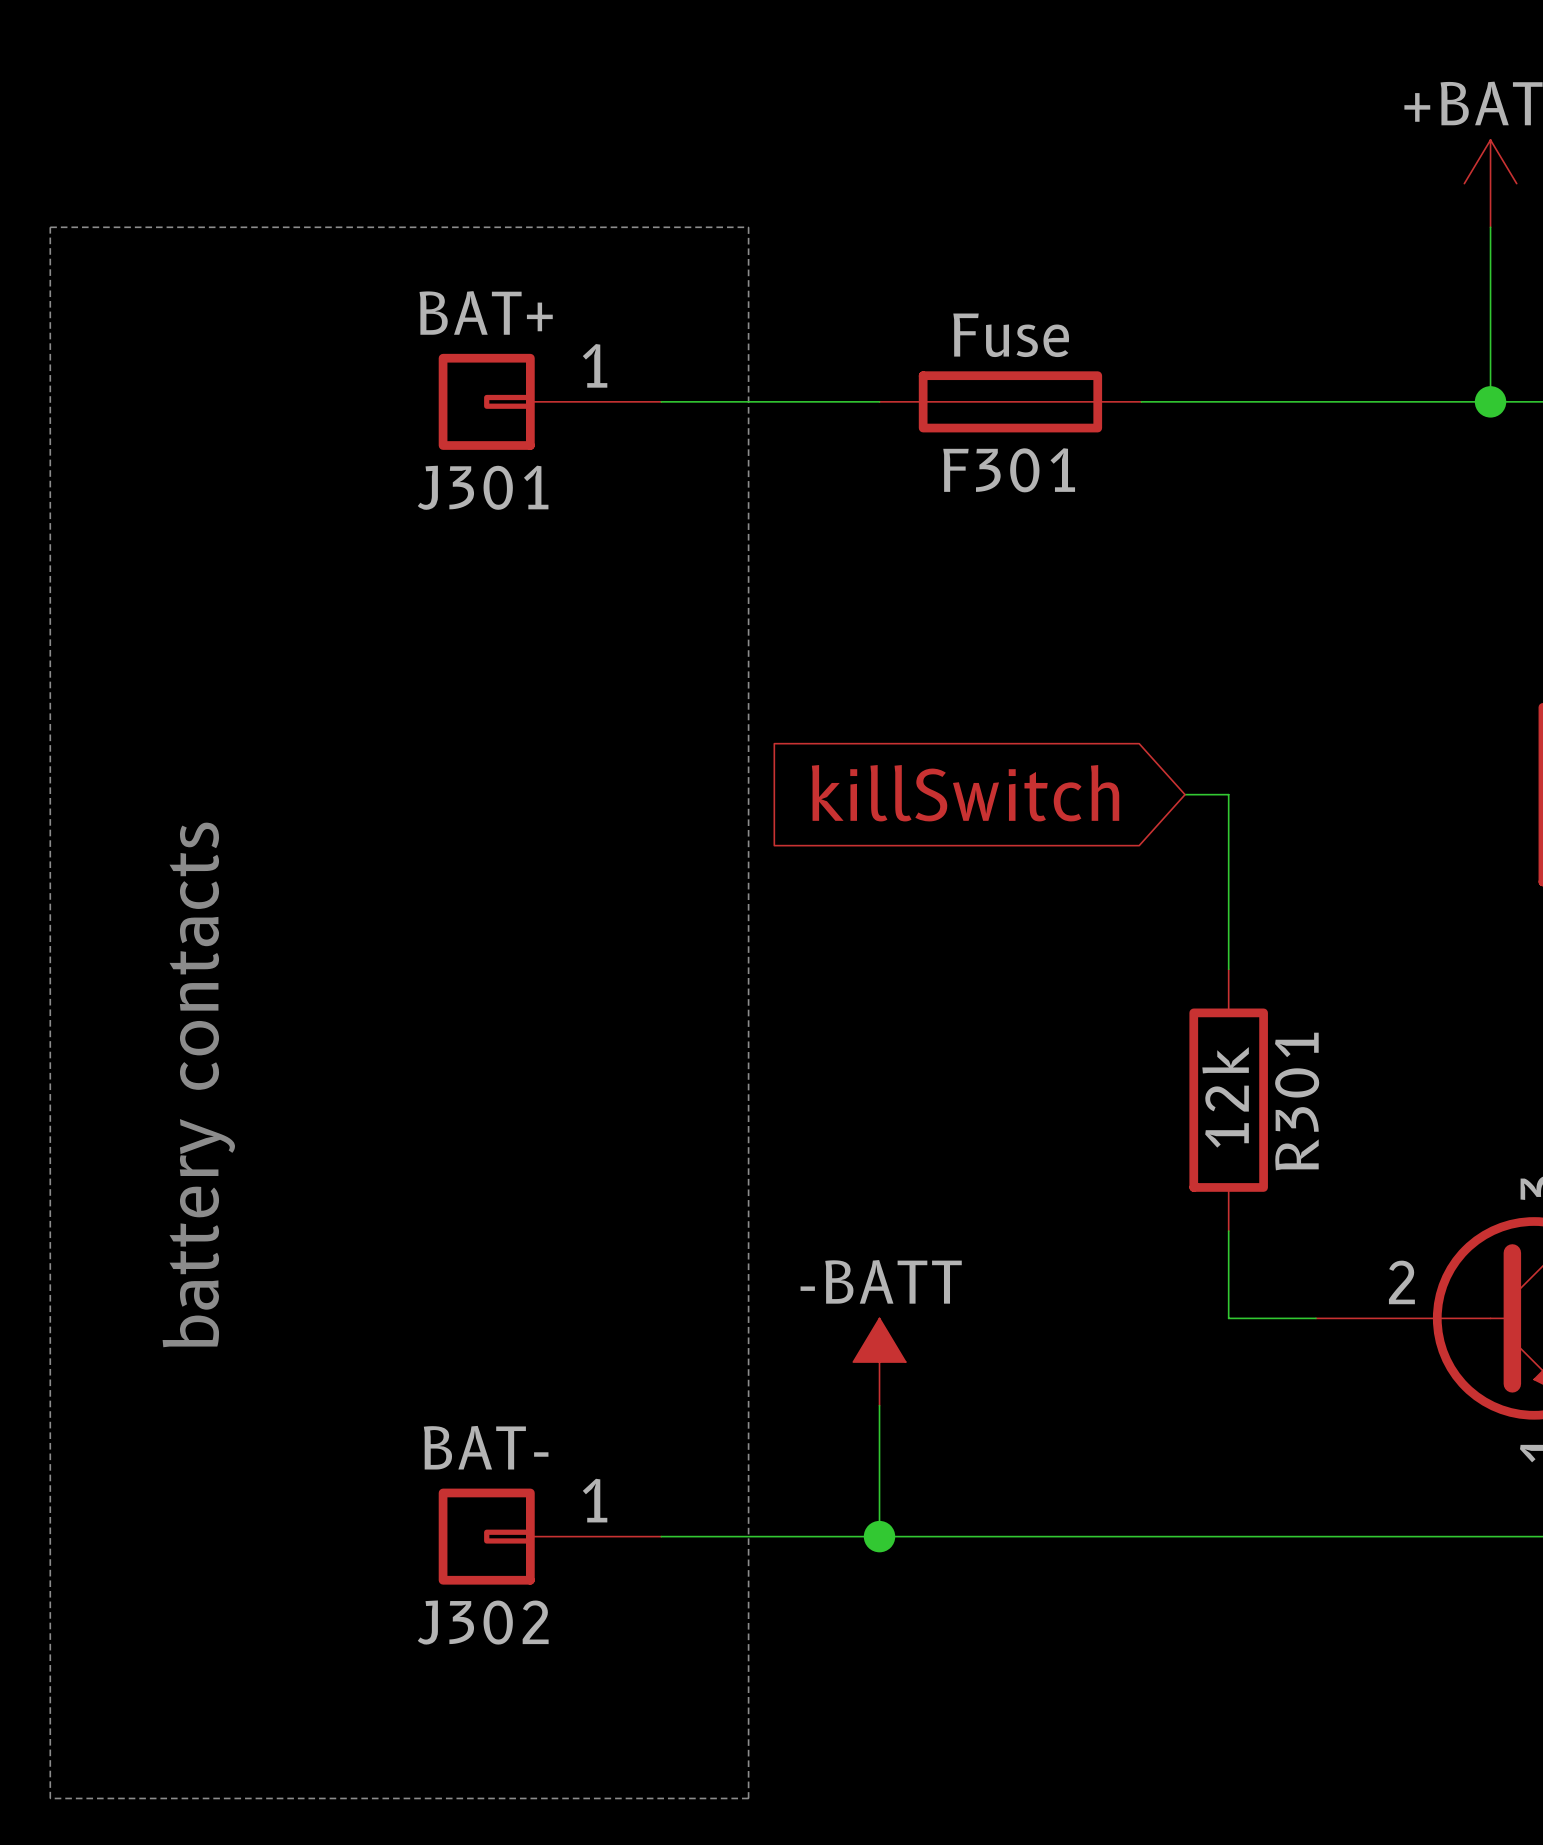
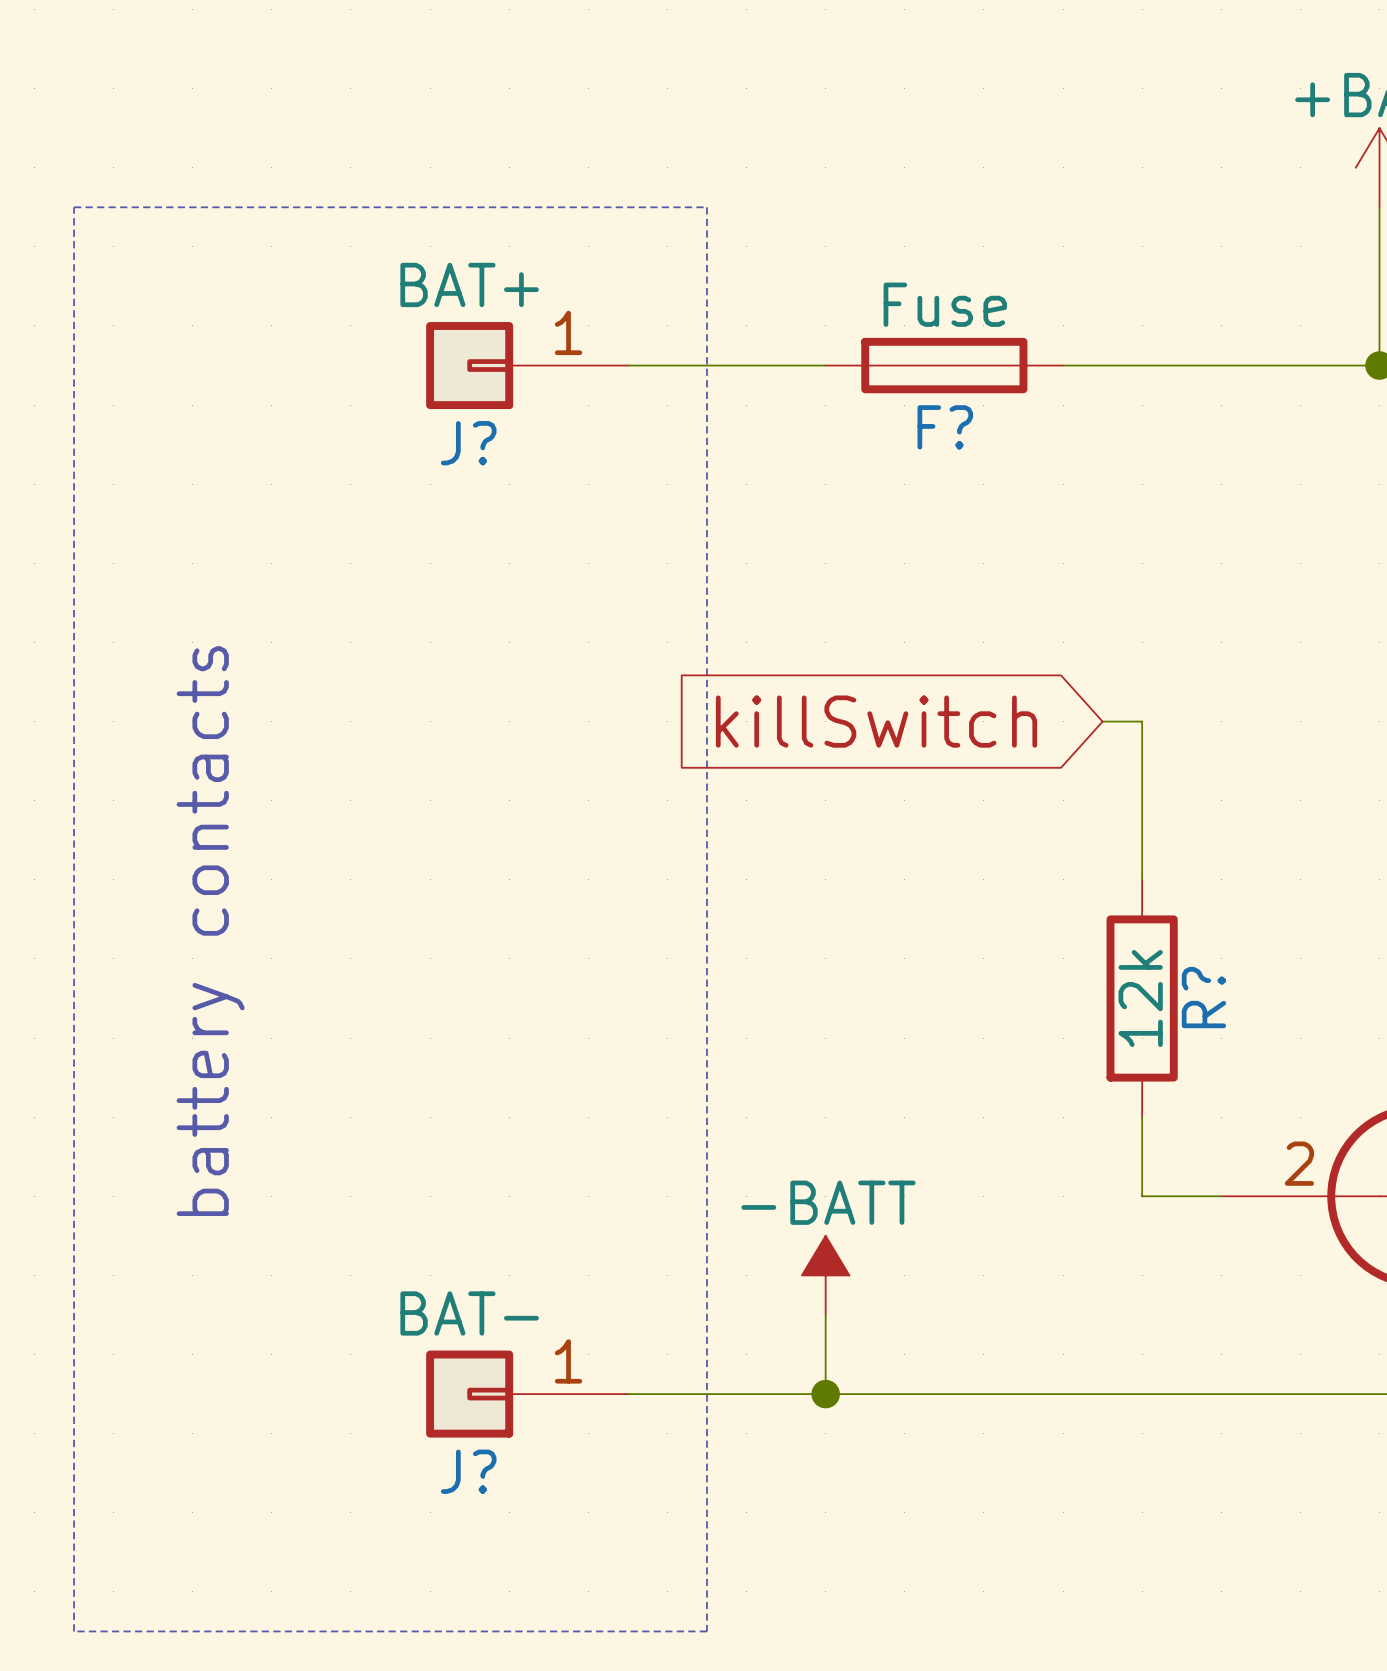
F301 name: F301 (1009, 470) -> F? (945, 427)
J301 name: J301 (483, 487) -> J? (468, 443)
R301 name: R301 (1297, 1101) -> R? (1203, 997)
power symbol position: -BATT (879, 1362) -> -BATT (825, 1275)
J302 name: J302 (483, 1622) -> J? (468, 1471)

